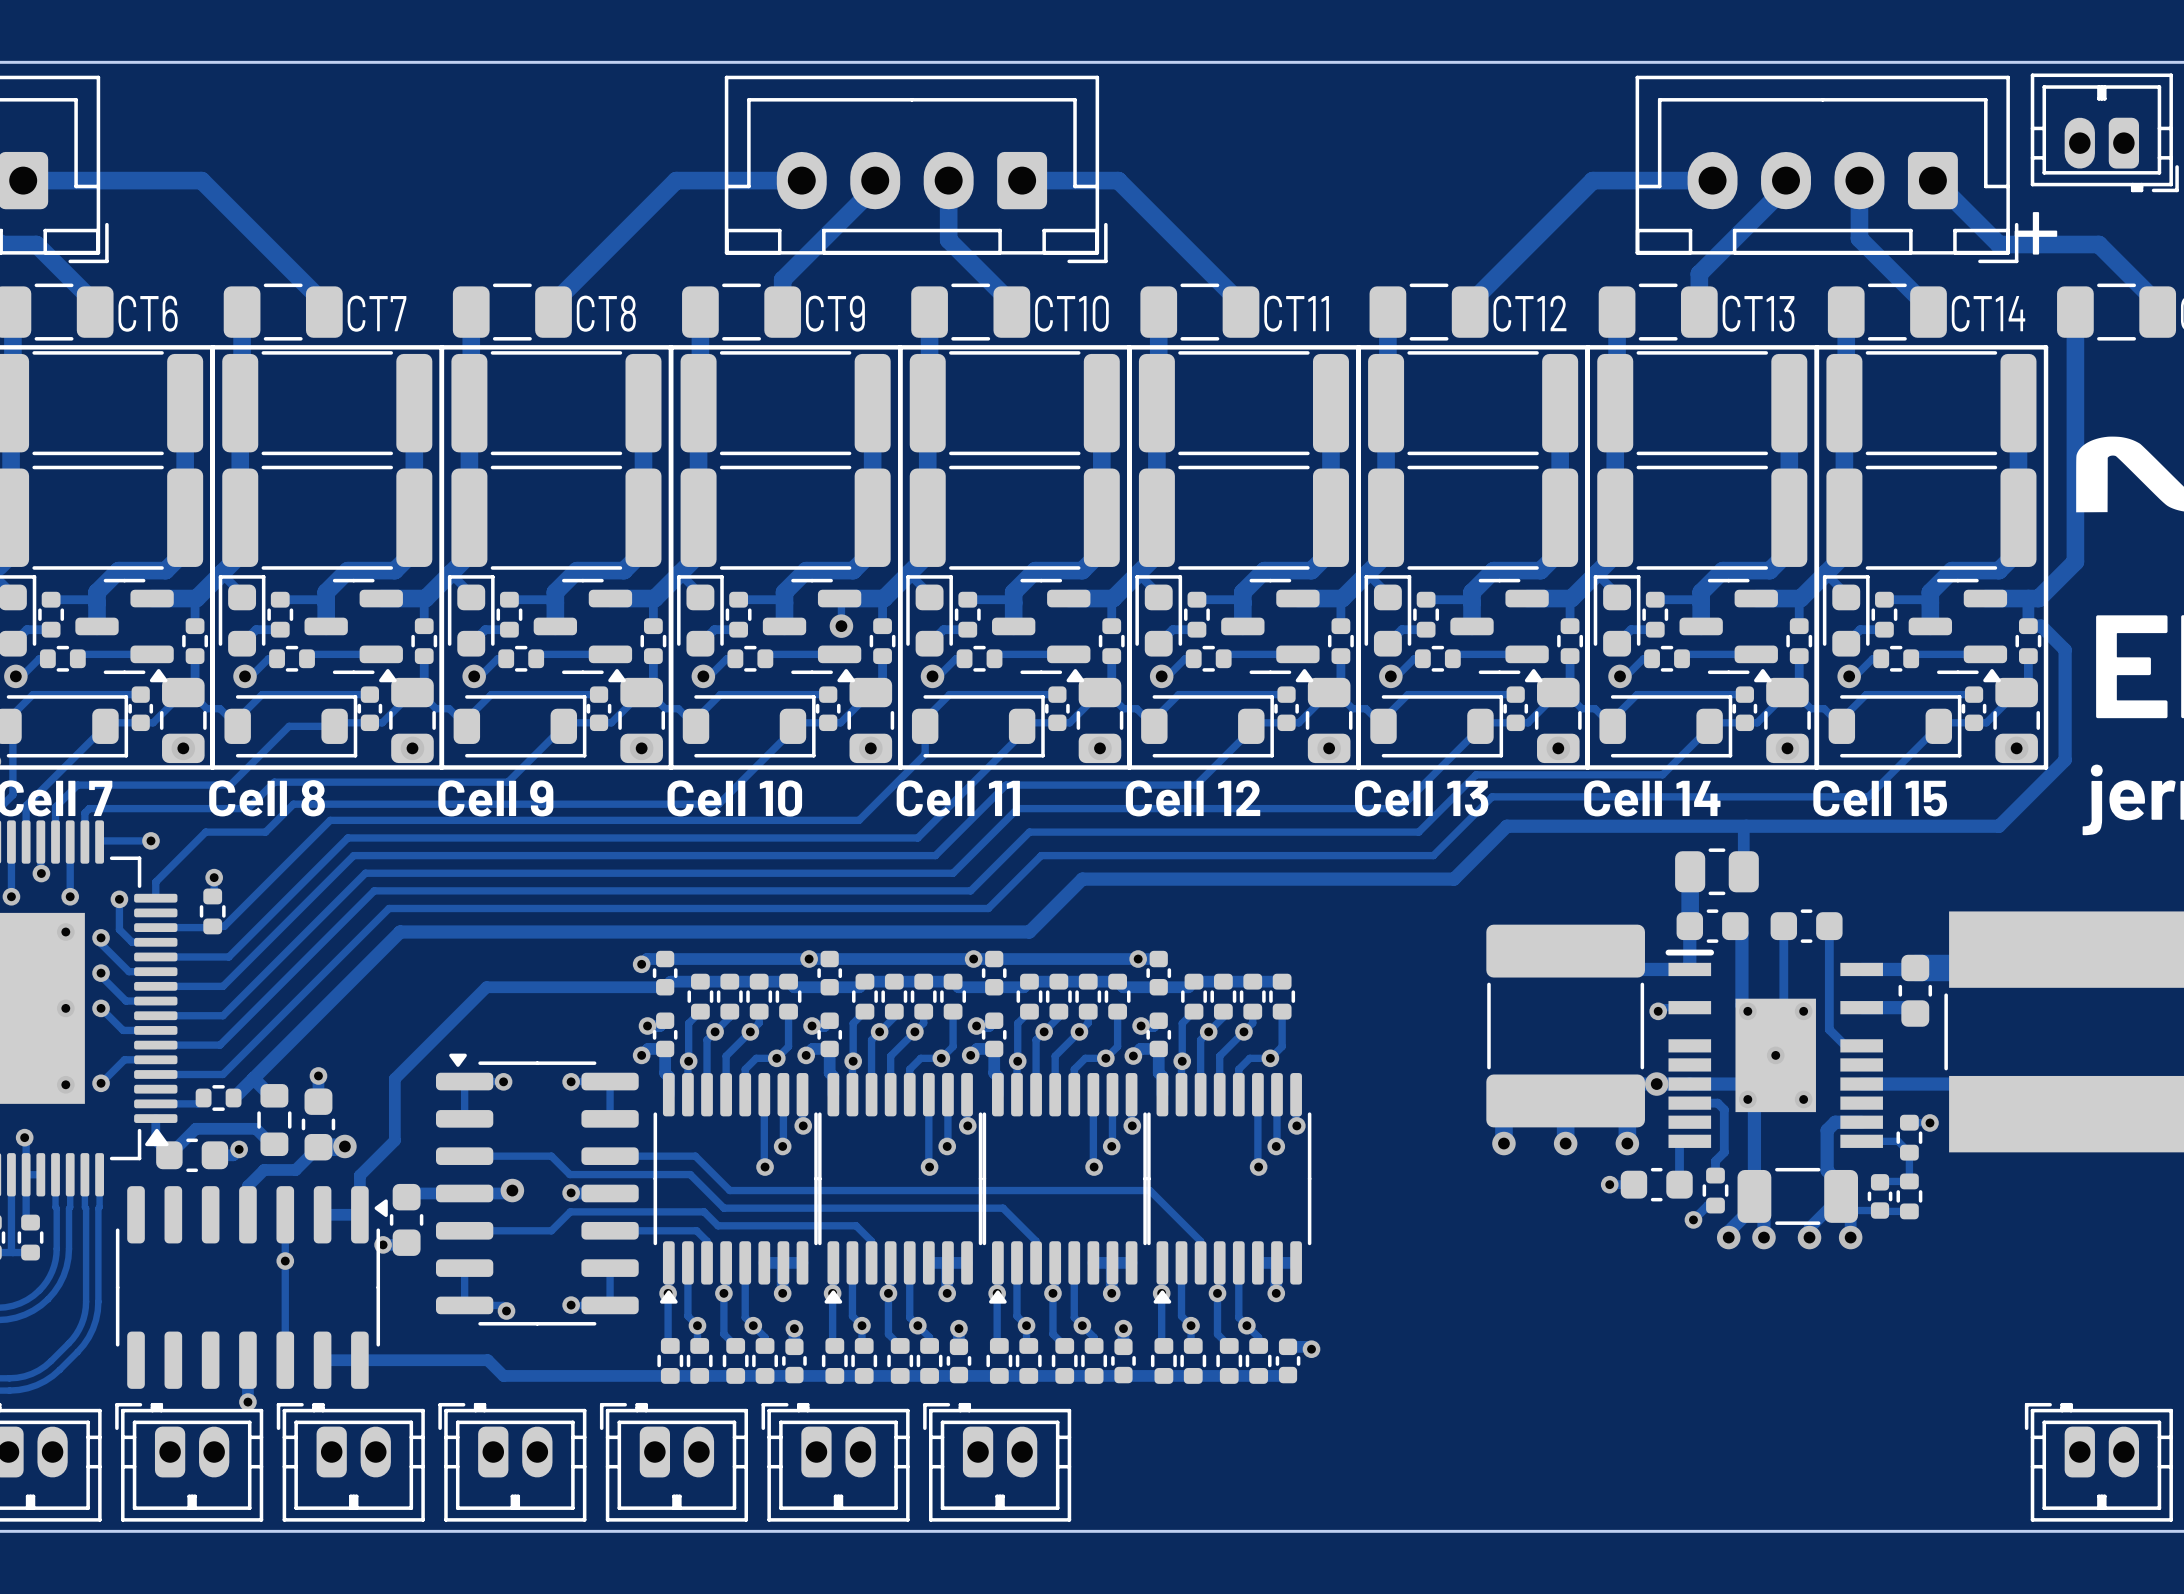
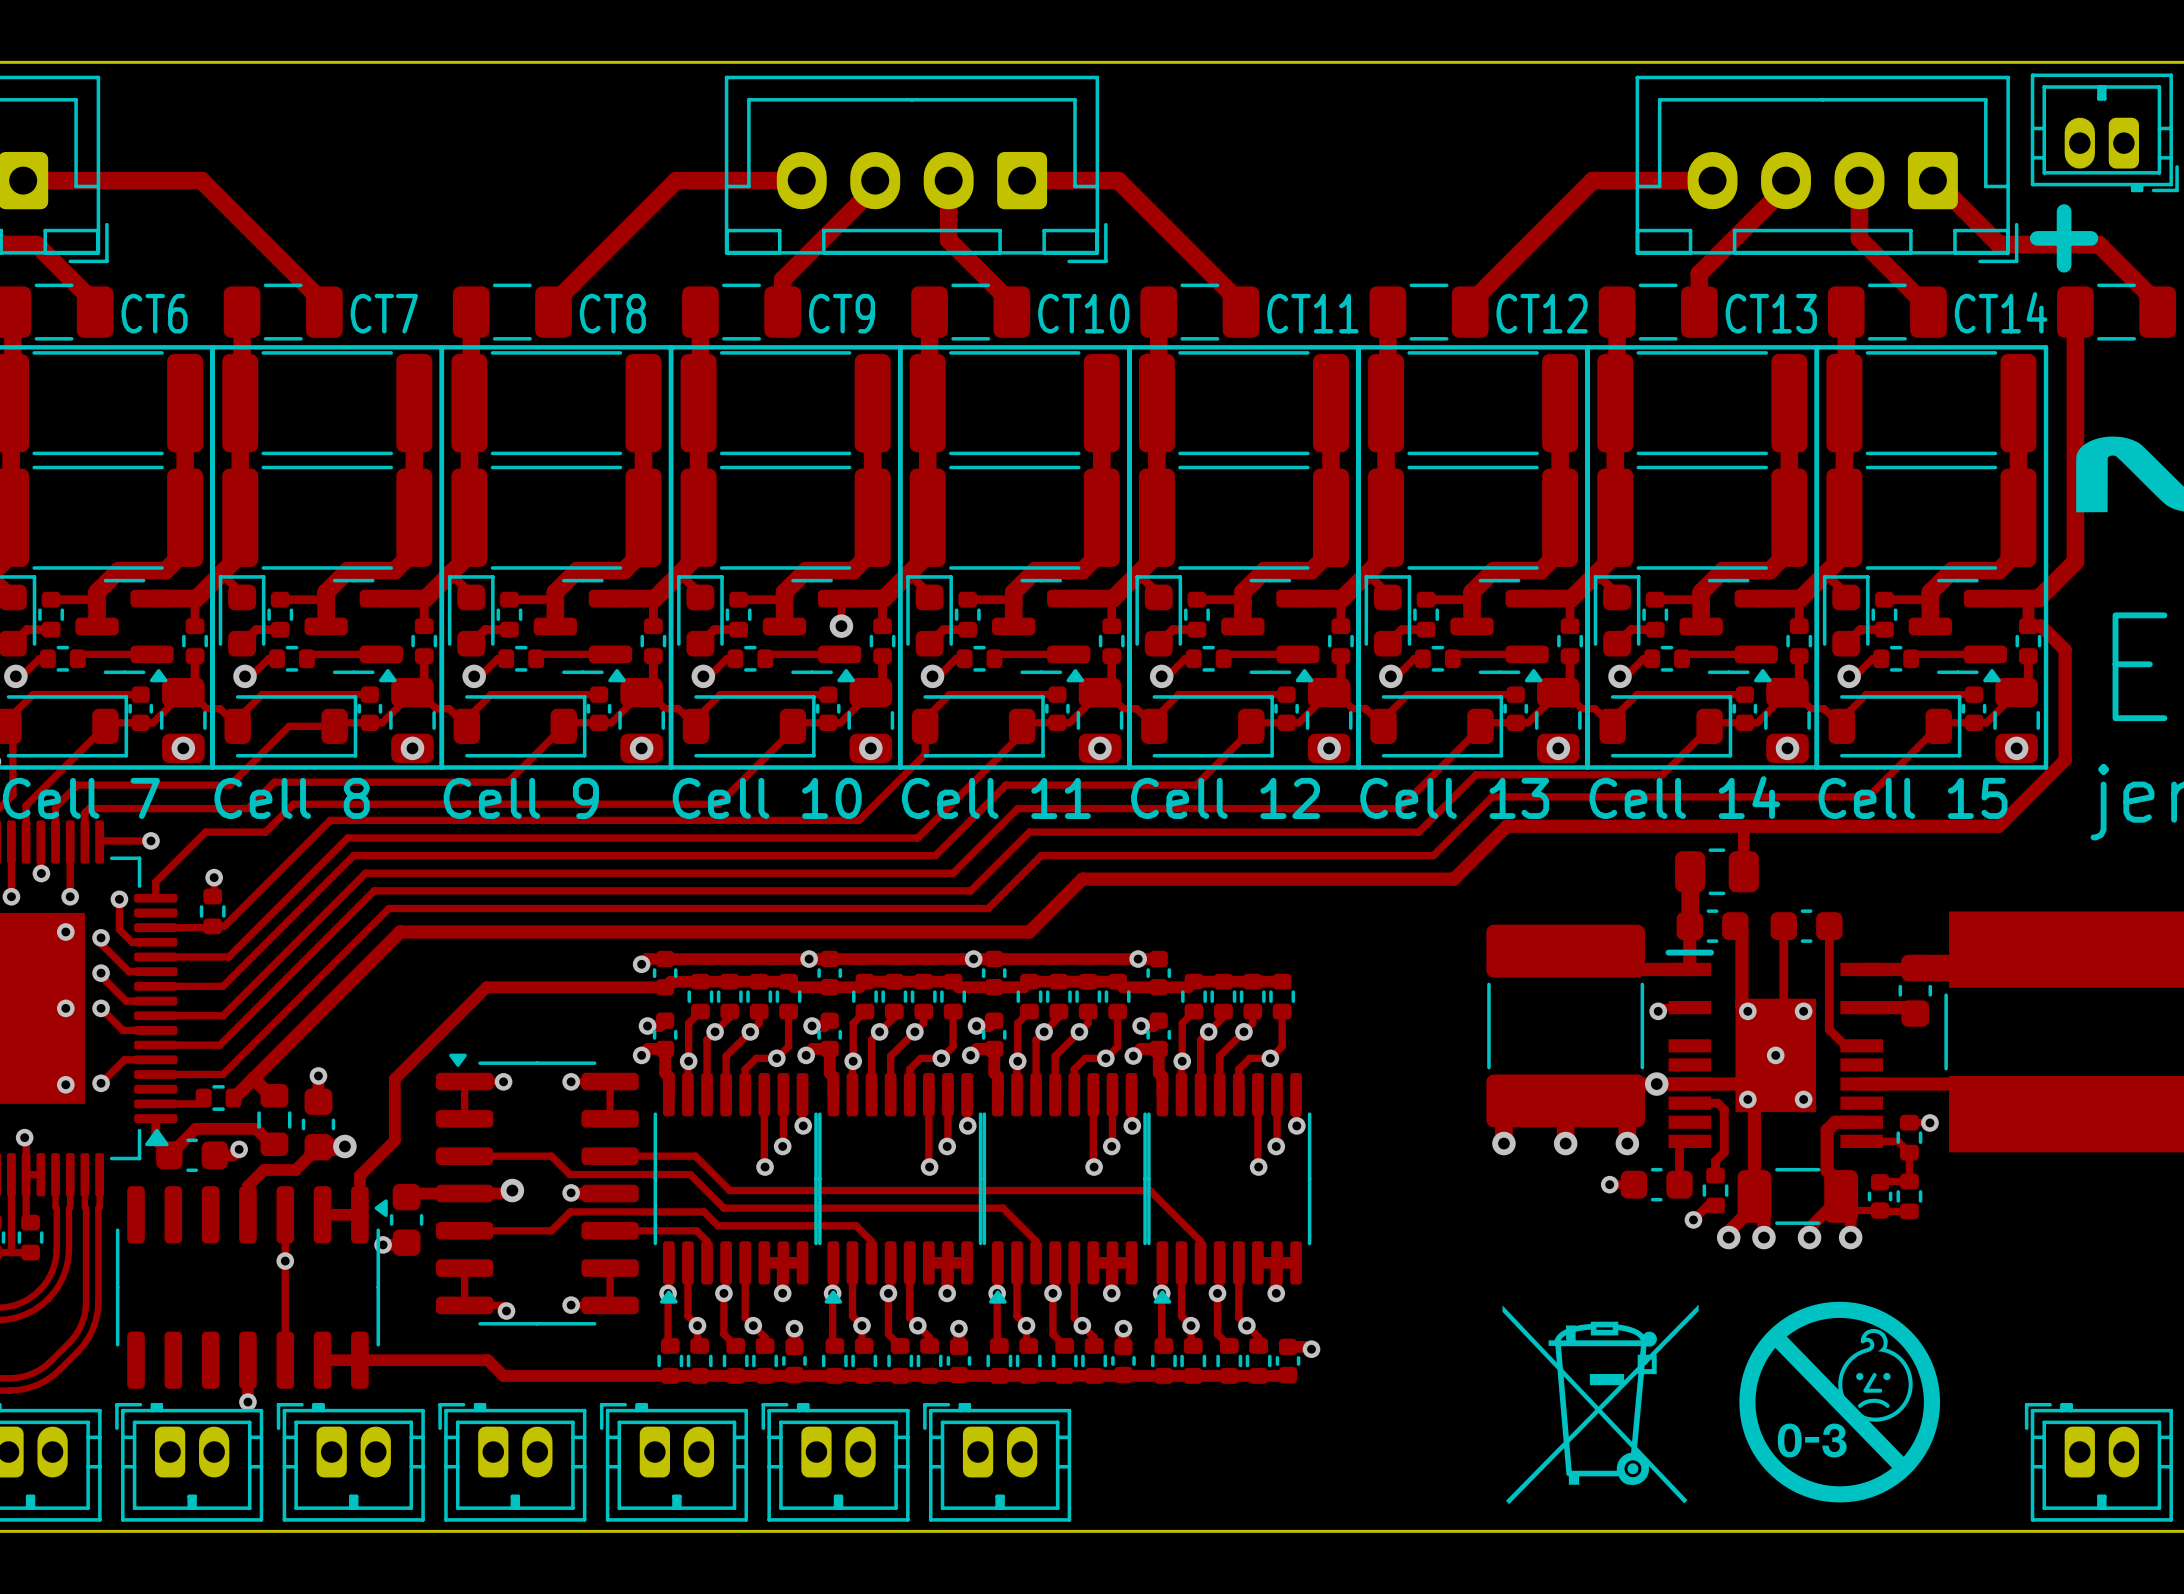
drawing: none -> [1739, 1301, 1941, 1503]
drawing: none -> [1502, 1304, 1699, 1505]

